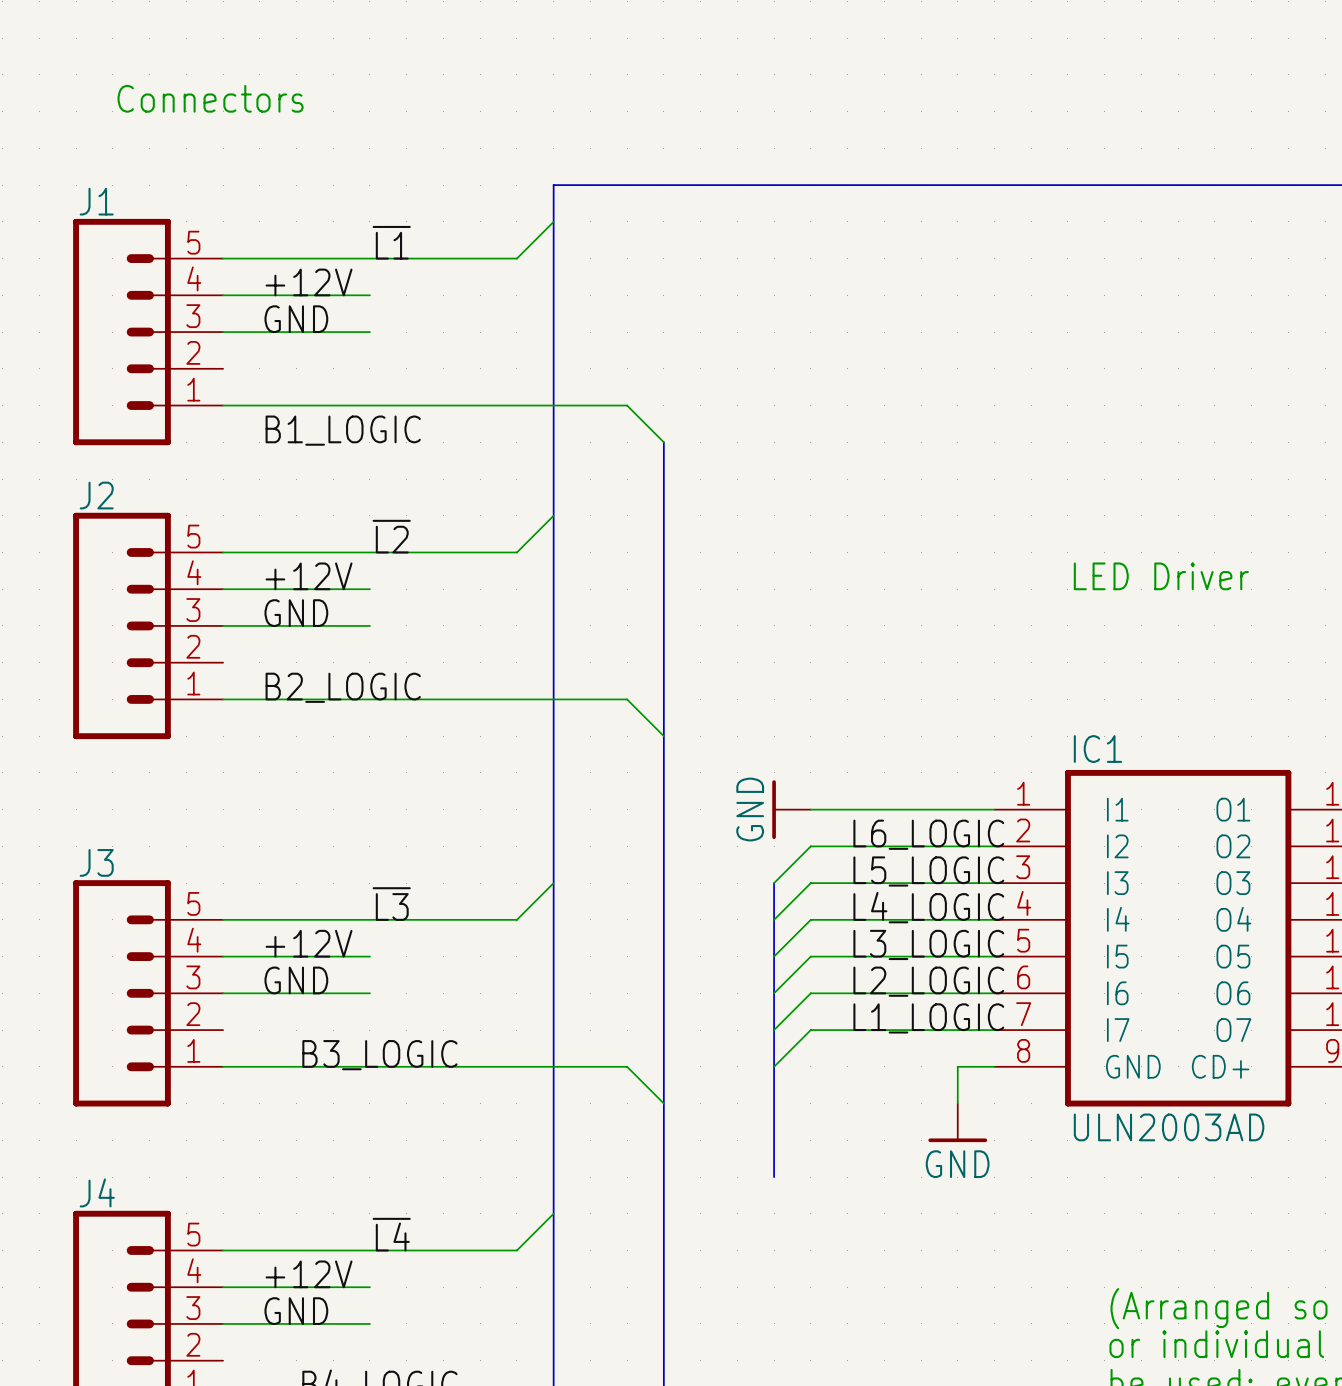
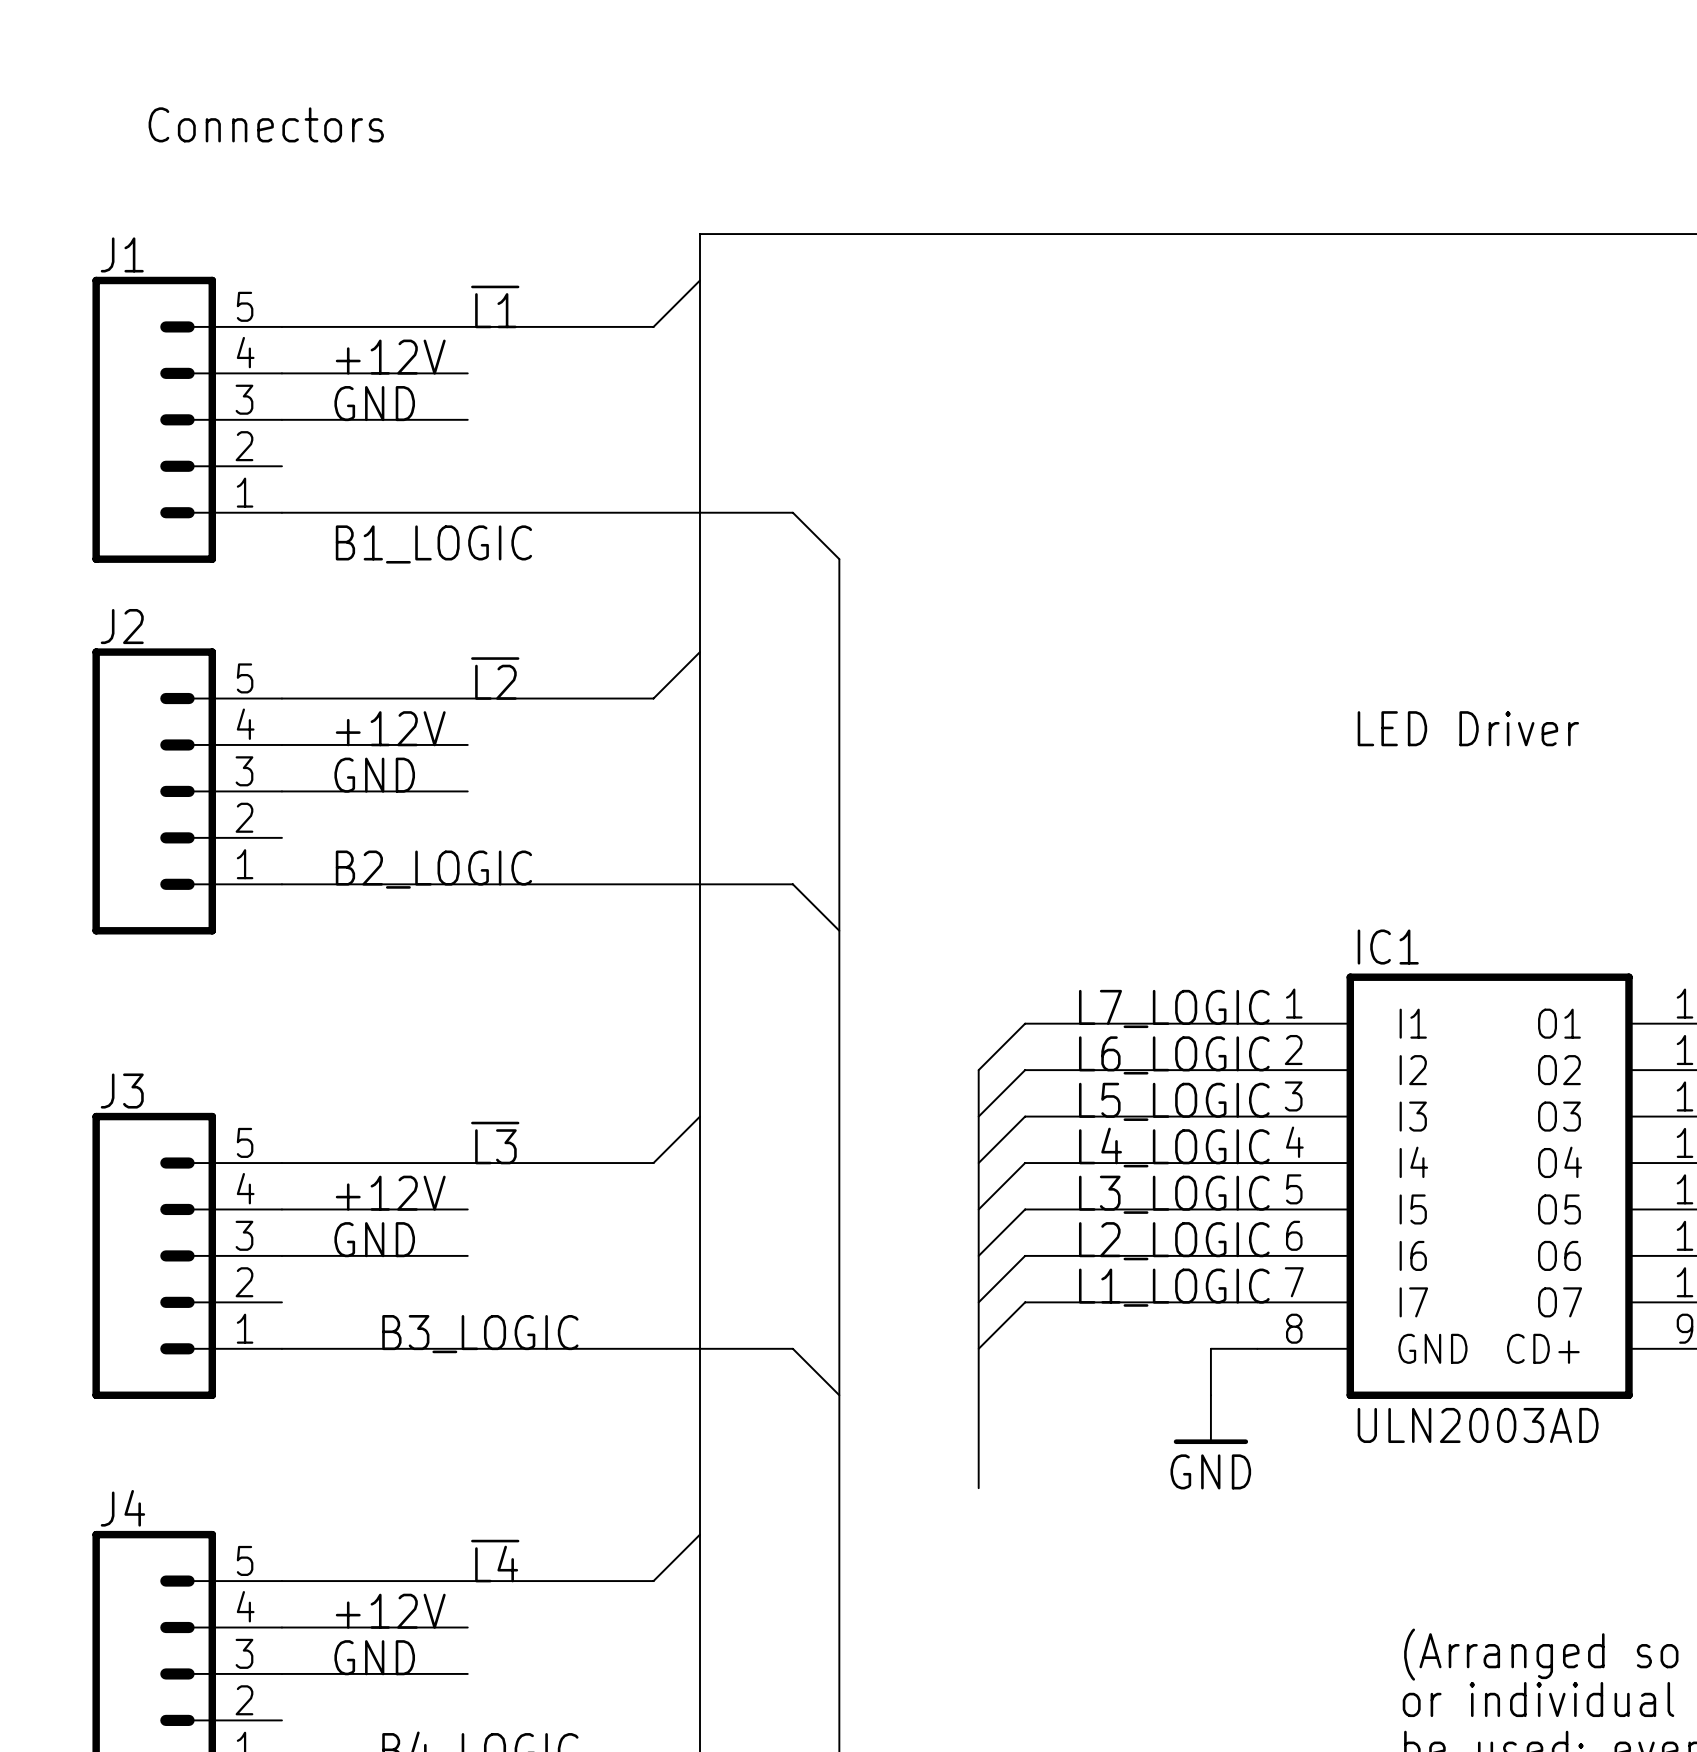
label: none -> L7_LOGIC (1174, 1008)
power symbol: GND (791, 809) -> none
wire: none -> (1025, 1023) (978, 1070)
bus: none -> (978, 1070) (978, 1116)

